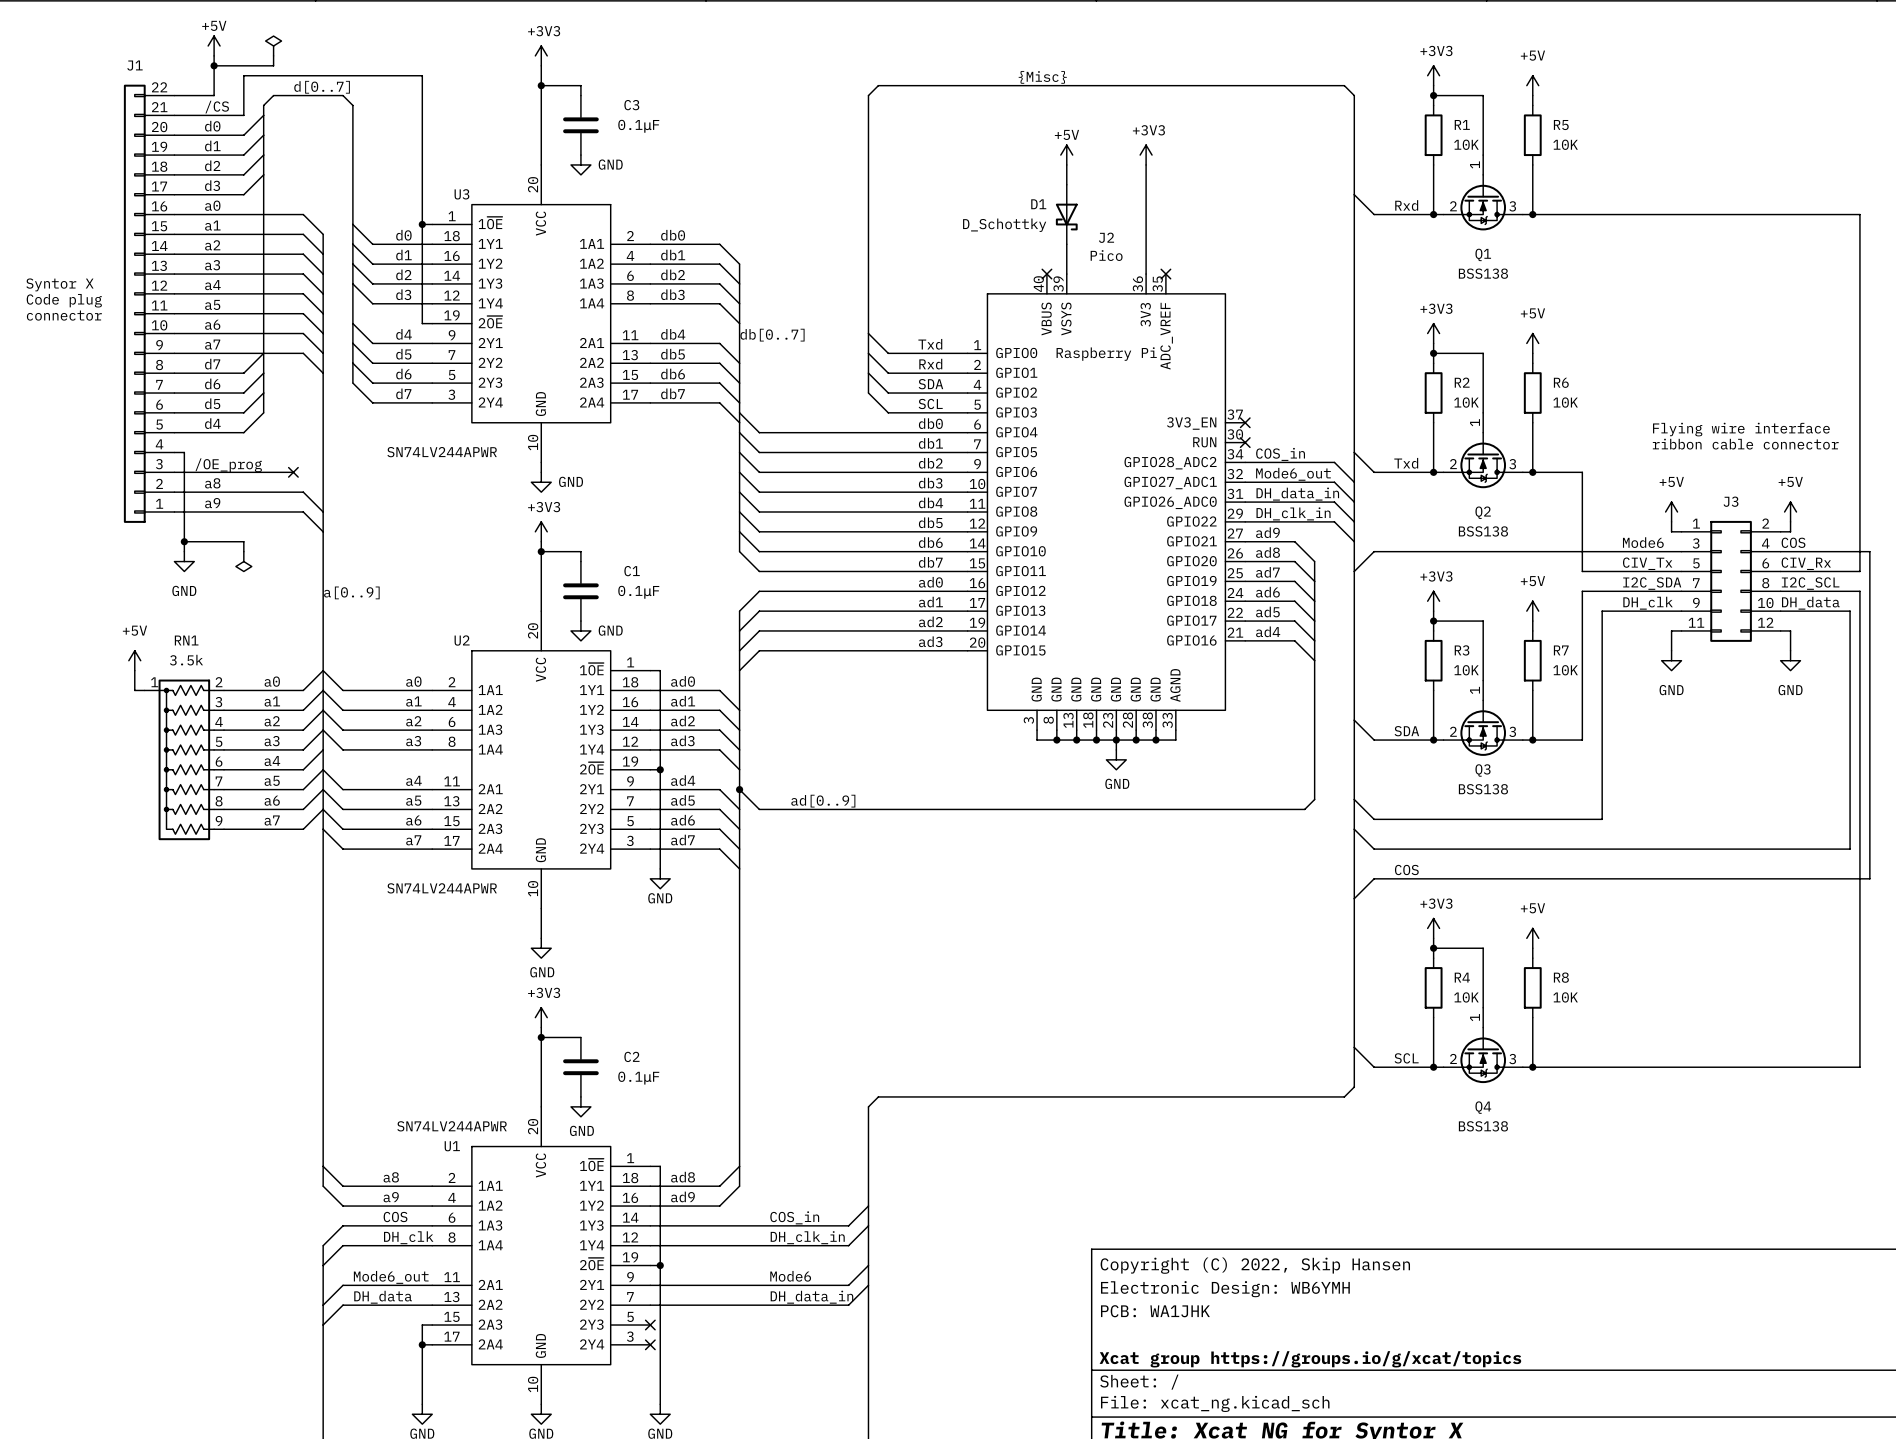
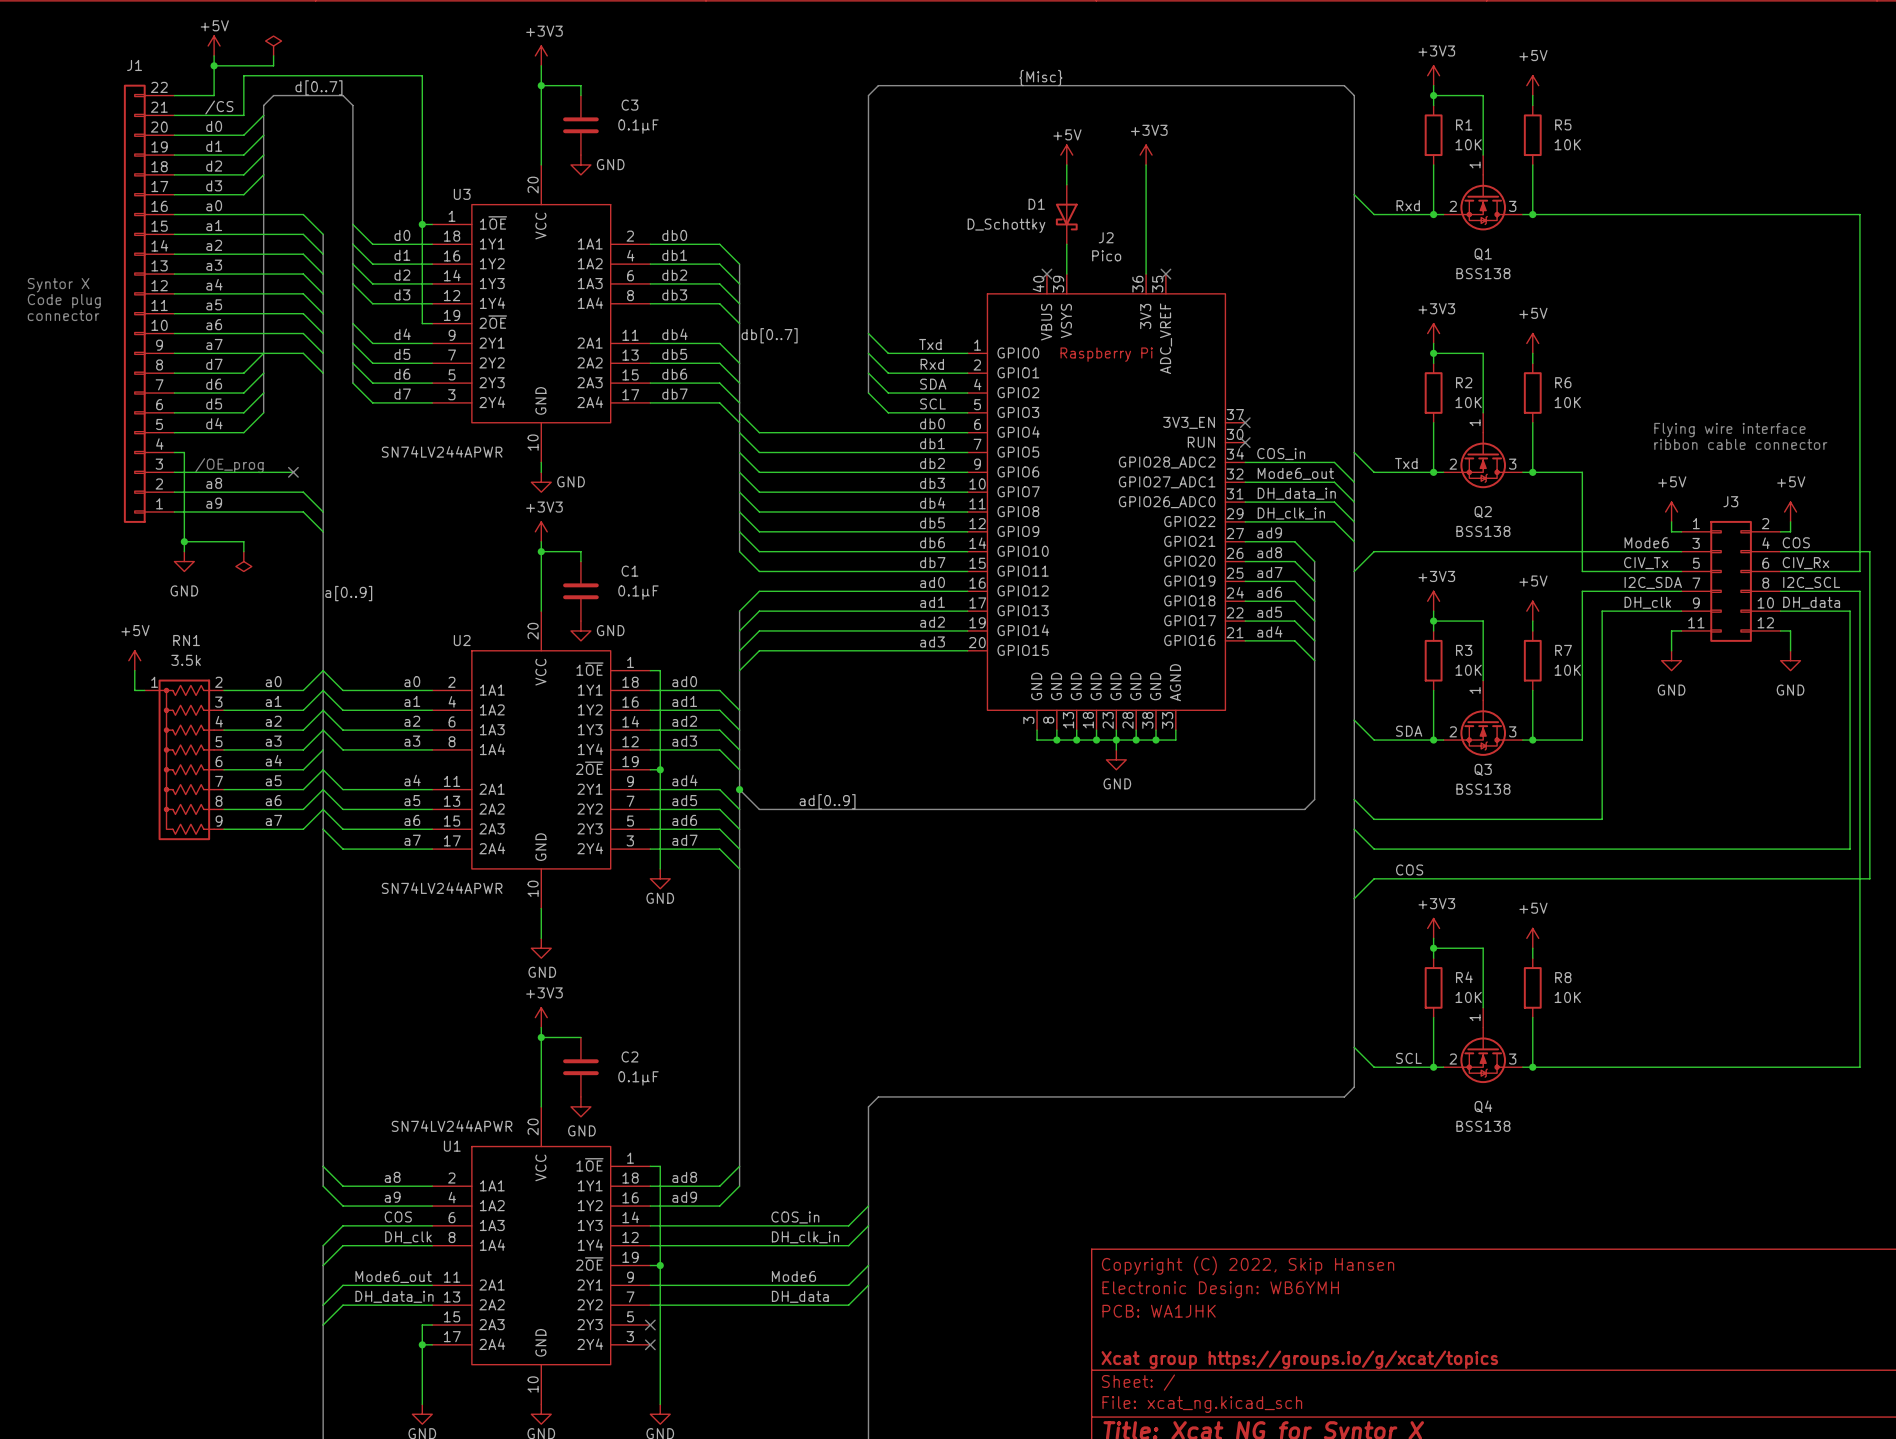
label: DH_data (383, 1297) -> DH_data_in (394, 1296)
label: DH_data_in (811, 1297) -> DH_data (800, 1296)

